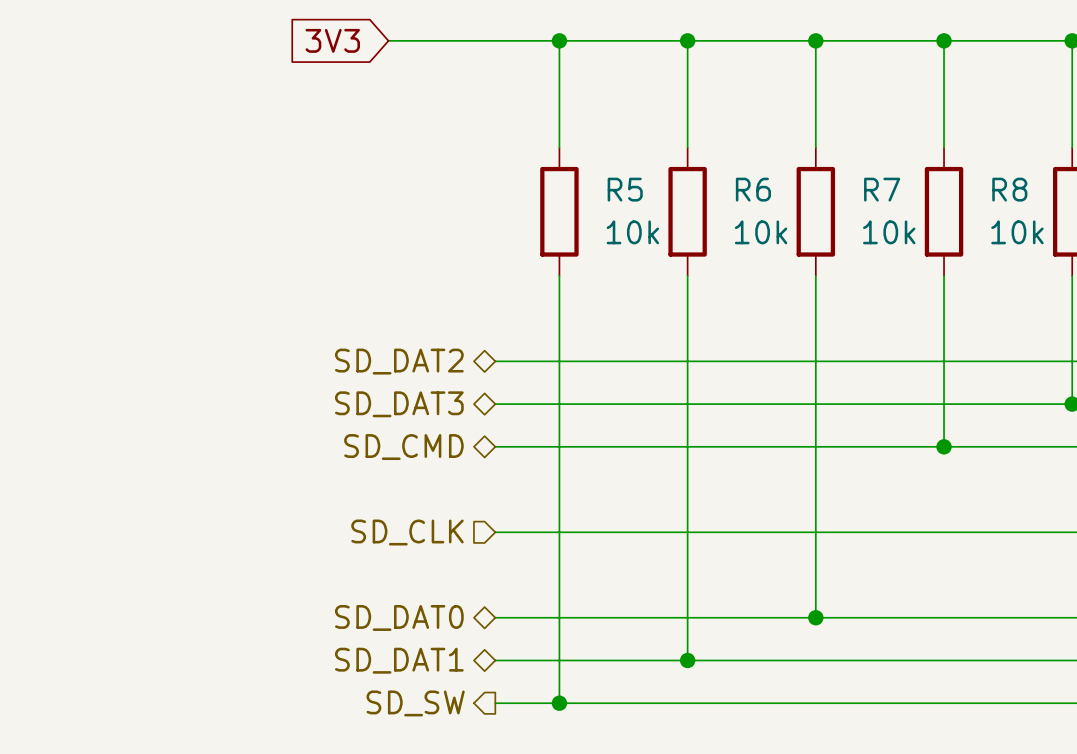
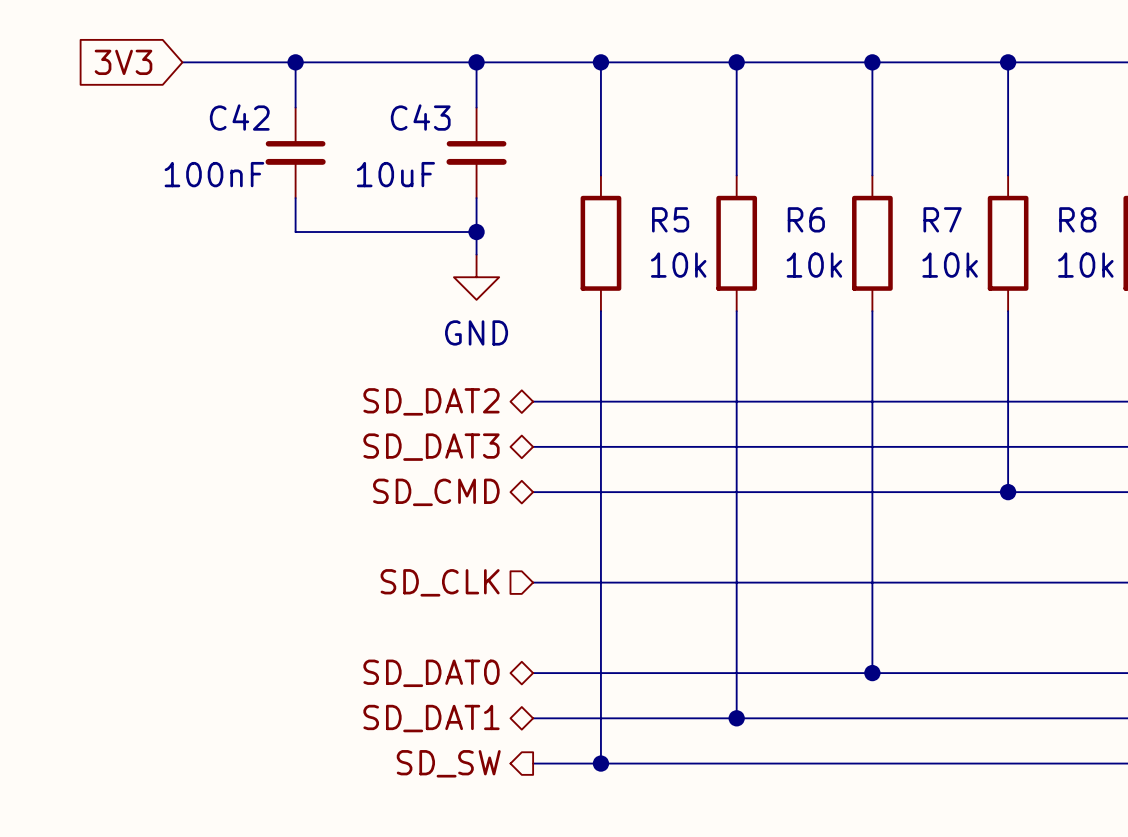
wire: none -> (182, 62) (420, 62)
wire: none -> (295, 62) (295, 107)
junction: none -> (295, 62)
global label position: 3V3 (332, 40) -> 3V3 (123, 62)
wire: none -> (476, 62) (476, 107)
junction: none -> (476, 62)
C42: none -> 100nF (295, 152)
C43: none -> 10uF (476, 152)
wire: none -> (295, 198) (295, 232) (476, 232)
wire: none -> (476, 198) (476, 254)
junction: none -> (476, 232)
power symbol: none -> GND (476, 277)

